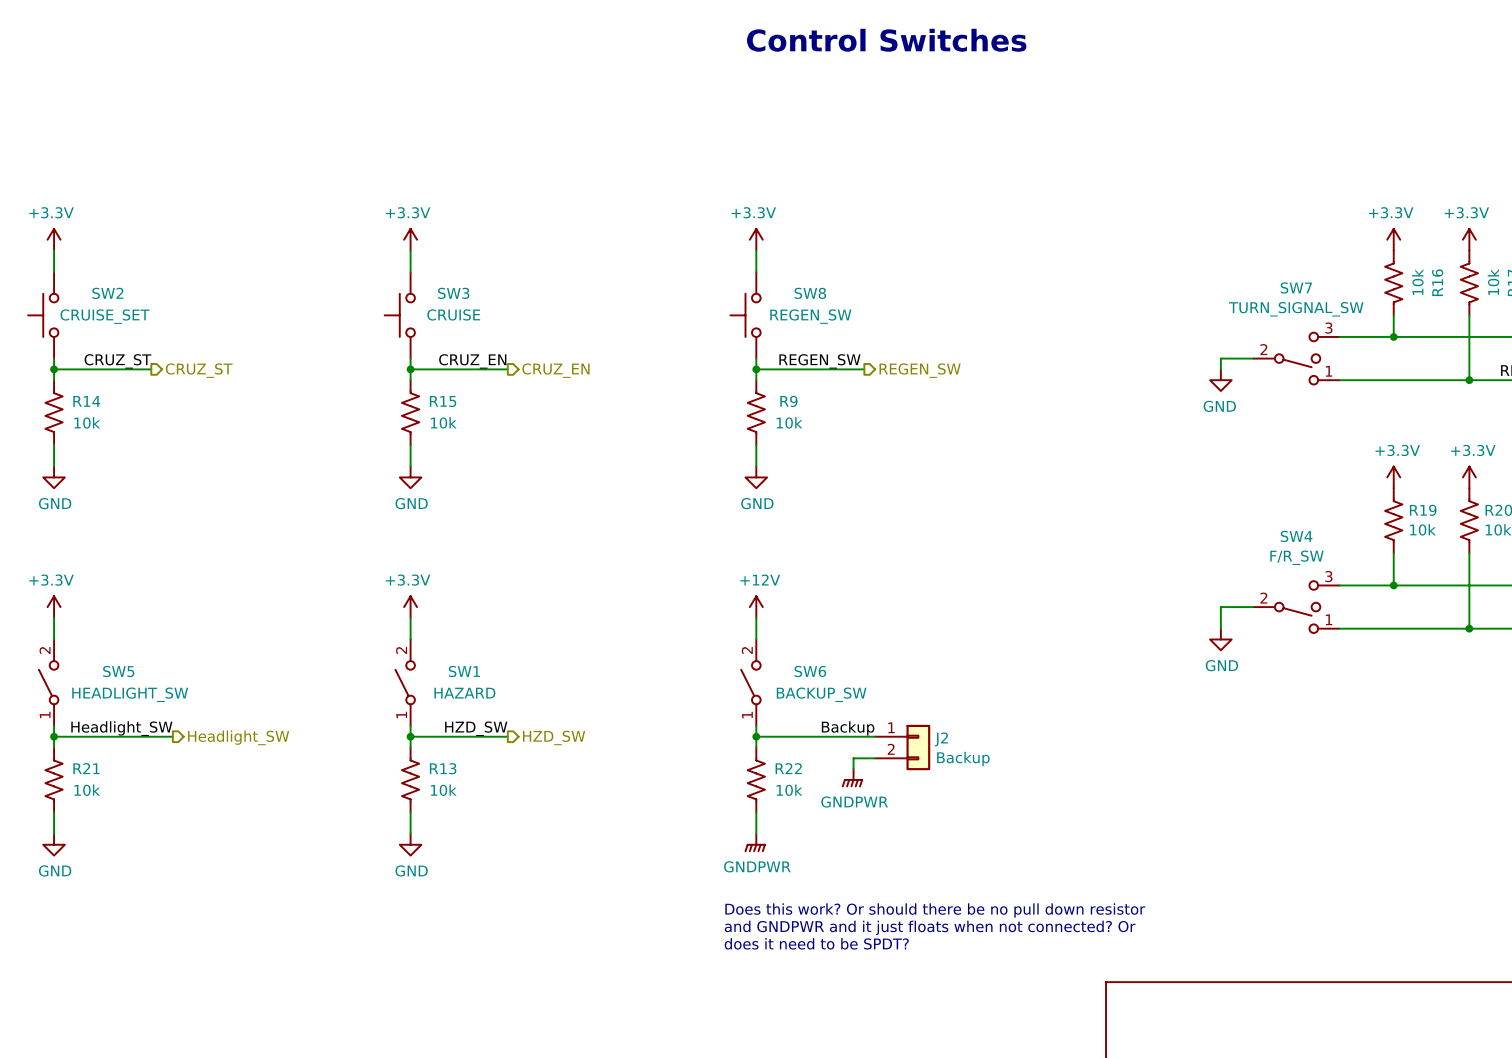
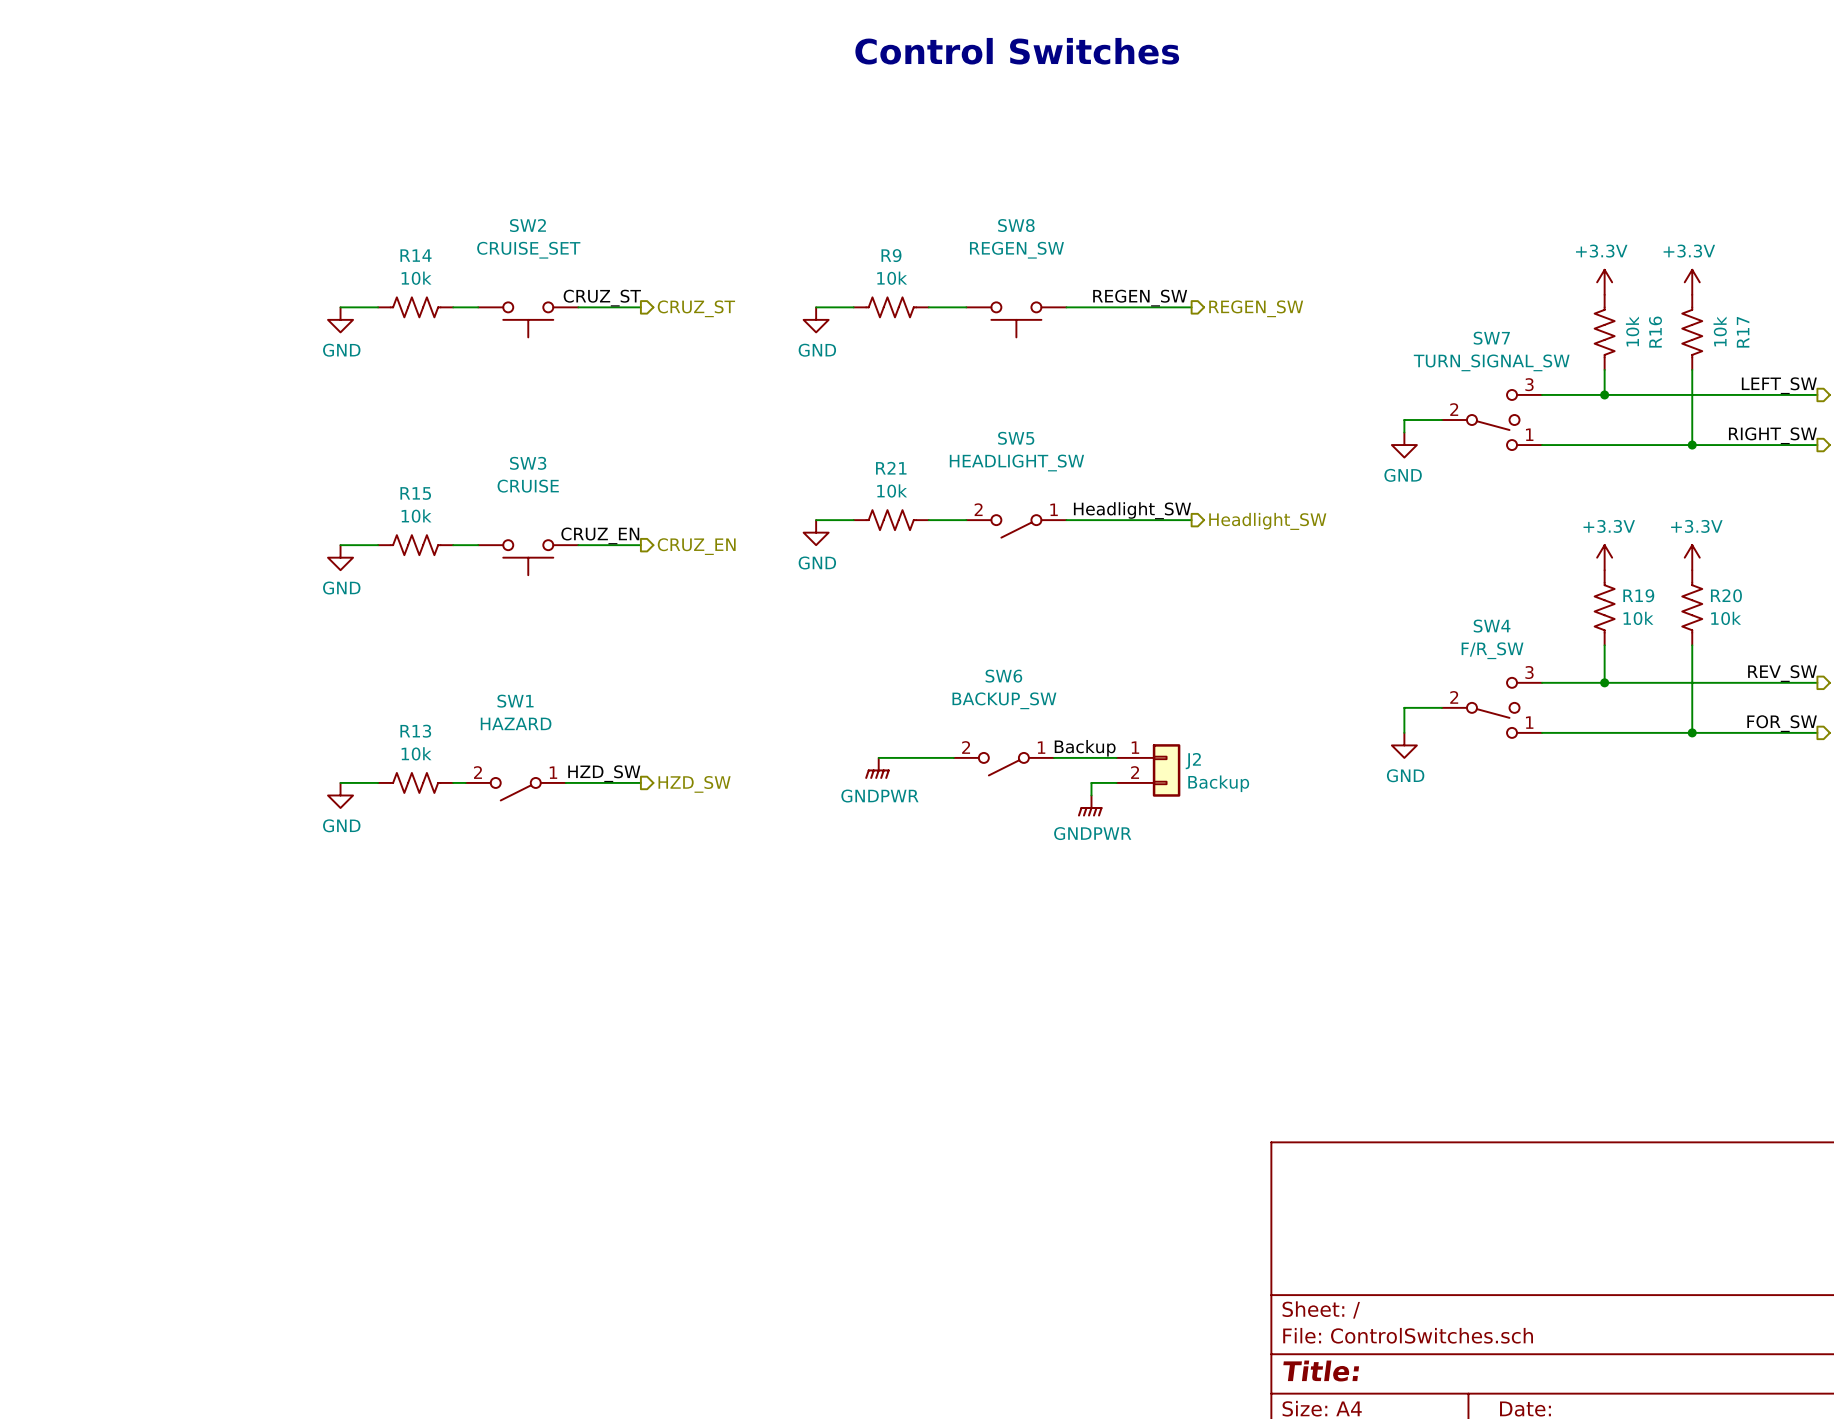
power symbol: +3.3V (54, 239) -> none
power symbol: +3.3V (410, 239) -> none
power symbol: +3.3V (756, 239) -> none
wire: (54, 250) (54, 272) -> none
wire: (410, 250) (410, 272) -> none
wire: (756, 250) (756, 272) -> none
label: none -> CRUZ_ST (602, 298)
wire: none -> (340, 307) (378, 307)
wire: none -> (453, 307) (478, 307)
wire: none -> (578, 307) (640, 307)
wire: none -> (816, 307) (853, 307)
wire: none -> (928, 307) (966, 307)
wire: none -> (1066, 307) (1191, 307)
hierarchical label: none -> CRUZ_ST (696, 308)
power symbol: none -> GND (340, 319)
power symbol: none -> GND (816, 319)
SW2 name position: SW2 (107, 293) -> SW2 (527, 225)
SW3 name position: SW3 (453, 293) -> SW3 (528, 463)
SW8 name position: SW8 (810, 293) -> SW8 (1016, 225)
SW2 rotation: 0° (43, 315) -> 90° counterclockwise (528, 319)
SW2 position: (43, 315) -> (528, 319)
SW3 rotation: 0° (399, 315) -> 90° counterclockwise (528, 557)
SW3 position: (399, 315) -> (528, 557)
SW8 rotation: 0° (745, 315) -> 90° counterclockwise (1016, 319)
SW8 position: (745, 315) -> (1016, 319)
wire: (54, 358) (54, 380) -> none
wire: (410, 358) (410, 380) -> none
wire: (756, 358) (756, 380) -> none
label: CRUZ_ST (117, 361) -> none
label position: CRUZ_EN (472, 361) -> CRUZ_EN (600, 535)
label position: REGEN_SW (819, 361) -> REGEN_SW (1140, 298)
wire: (54, 369) (151, 369) -> none
junction: (54, 369) -> none
wire: (410, 369) (507, 369) -> none
junction: (410, 369) -> none
wire: (756, 369) (864, 369) -> (1066, 520) (1191, 520)
junction: (756, 369) -> none
hierarchical label: CRUZ_ST (199, 370) -> none
hierarchical label position: CRUZ_EN (555, 370) -> CRUZ_EN (696, 546)
hierarchical label position: REGEN_SW (920, 370) -> REGEN_SW (1256, 308)
R14 name position: R14 (86, 401) -> R14 (415, 255)
R15 name position: R15 (443, 401) -> R15 (415, 493)
R9 name position: R9 (788, 401) -> R9 (891, 255)
R14 rotation: 0° (54, 412) -> 90° clockwise (415, 307)
R14 position: (54, 412) -> (415, 307)
R15 rotation: 0° (410, 412) -> 90° clockwise (415, 545)
R15 position: (410, 412) -> (415, 545)
R9 rotation: 0° (756, 412) -> 90° clockwise (891, 307)
R9 position: (756, 412) -> (891, 307)
R14 value position: 10k (87, 422) -> 10k (416, 278)
R15 value position: 10k (443, 422) -> 10k (416, 516)
R9 value position: 10k (789, 422) -> 10k (892, 278)
label: none -> Headlight_SW (1132, 510)
wire: (54, 445) (54, 466) -> none
wire: (410, 445) (410, 466) -> none
wire: none -> (816, 520) (853, 520)
wire: (756, 445) (756, 466) -> none
wire: none -> (928, 520) (966, 520)
hierarchical label: none -> Headlight_SW (1267, 521)
wire: none -> (340, 545) (378, 545)
wire: none -> (453, 545) (478, 545)
wire: none -> (578, 545) (640, 545)
power symbol: GND (54, 477) -> none
power symbol position: GND (410, 477) -> GND (340, 557)
power symbol position: GND (756, 477) -> GND (816, 532)
power symbol: +3.3V (54, 607) -> none
power symbol: +3.3V (410, 607) -> none
power symbol: +12V (756, 607) -> none
wire: (54, 617) (54, 639) -> none
wire: (410, 617) (410, 639) -> none
wire: (756, 617) (756, 639) -> none
wire: none -> (878, 757) (953, 757)
wire: none -> (1053, 757) (1116, 757)
power symbol: none -> GNDPWR (877, 768)
wire: none -> (340, 782) (378, 782)
wire: none -> (453, 782) (465, 782)
SW1 name position: SW1 (464, 671) -> SW1 (515, 701)
wire: none -> (565, 782) (640, 782)
SW6 name position: SW6 (810, 671) -> SW6 (1003, 676)
SW5 rotation: 0° (48, 682) -> 90° counterclockwise (1016, 526)
SW5 position: (48, 682) -> (1016, 526)
power symbol: none -> GND (340, 795)
SW1 rotation: 0° (405, 682) -> 90° counterclockwise (515, 789)
SW6 rotation: 0° (750, 682) -> 90° counterclockwise (1003, 764)
SW6 position: (750, 682) -> (1003, 764)
power symbol: none -> GNDPWR (1090, 805)
SW5 value position: HEADLIGHT_SW (130, 694) -> HEADLIGHT_SW (1016, 463)
SW6 value position: BACKUP_SW (821, 694) -> BACKUP_SW (1004, 700)
wire: (54, 725) (54, 747) -> none
wire: (410, 725) (410, 747) -> none
wire: (756, 725) (756, 747) -> none
label: Headlight_SW (121, 728) -> none
label position: HZD_SW (476, 728) -> HZD_SW (604, 773)
label position: Backup (848, 728) -> Backup (1085, 748)
wire: (54, 736) (172, 736) -> none
junction: (54, 736) -> none
wire: (410, 736) (507, 736) -> none
junction: (410, 736) -> none
wire: (756, 736) (875, 736) -> none
junction: (756, 736) -> none
hierarchical label: Headlight_SW (238, 737) -> none
hierarchical label position: HZD_SW (554, 737) -> HZD_SW (694, 784)
J2 position: (902, 747) -> (1148, 770)
wire: (875, 758) (853, 758) (853, 769) -> (1116, 782) (1091, 782) (1091, 795)
R21 name position: R21 (86, 768) -> R21 (891, 468)
R13 name position: R13 (443, 768) -> R13 (415, 731)
power symbol: GNDPWR (852, 778) -> none
R21 rotation: 0° (54, 779) -> 90° clockwise (891, 520)
R21 position: (54, 779) -> (891, 520)
R13 rotation: 0° (410, 779) -> 90° clockwise (415, 782)
R13 position: (410, 779) -> (415, 782)
R22: 10k (756, 779) -> none
R21 value position: 10k (87, 790) -> 10k (892, 490)
R13 value position: 10k (443, 790) -> 10k (416, 753)
wire: (54, 812) (54, 833) -> none
wire: (410, 812) (410, 833) -> none
wire: (756, 812) (756, 833) -> none
power symbol: GNDPWR (755, 843) -> none
power symbol: GND (54, 844) -> none
power symbol: GND (410, 844) -> none
text: Does this work? Or should there be no pull down resistor (935, 910) -> none
text: and GNDPWR and it just floats when not connected? Or (930, 927) -> none
text: does it need to be SPDT? (816, 943) -> none

